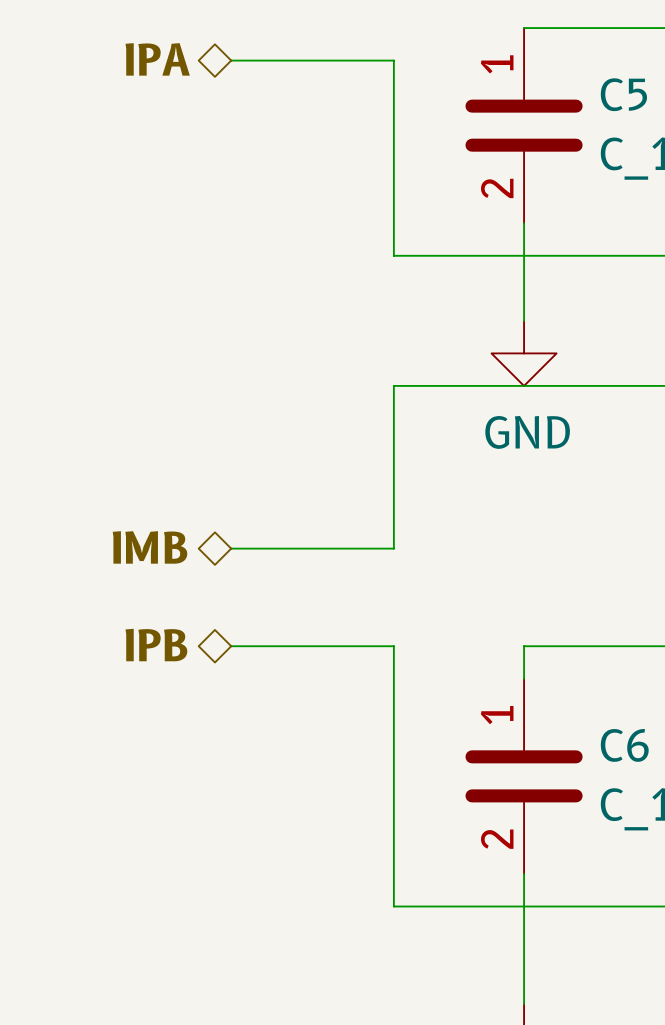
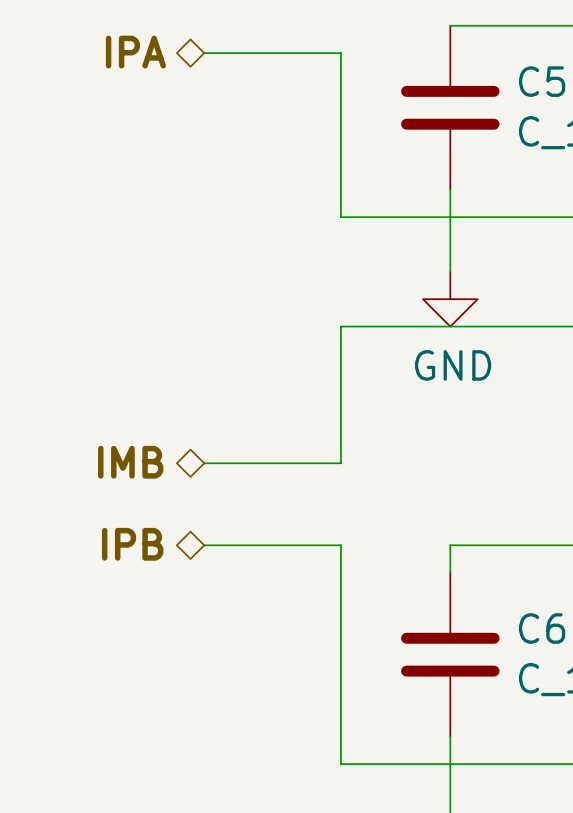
C5 pin number: 1 (497, 64) -> none
C5 pin number: 2 (497, 188) -> none
C6 pin number: 1 (497, 715) -> none
C6 pin number: 2 (497, 839) -> none

